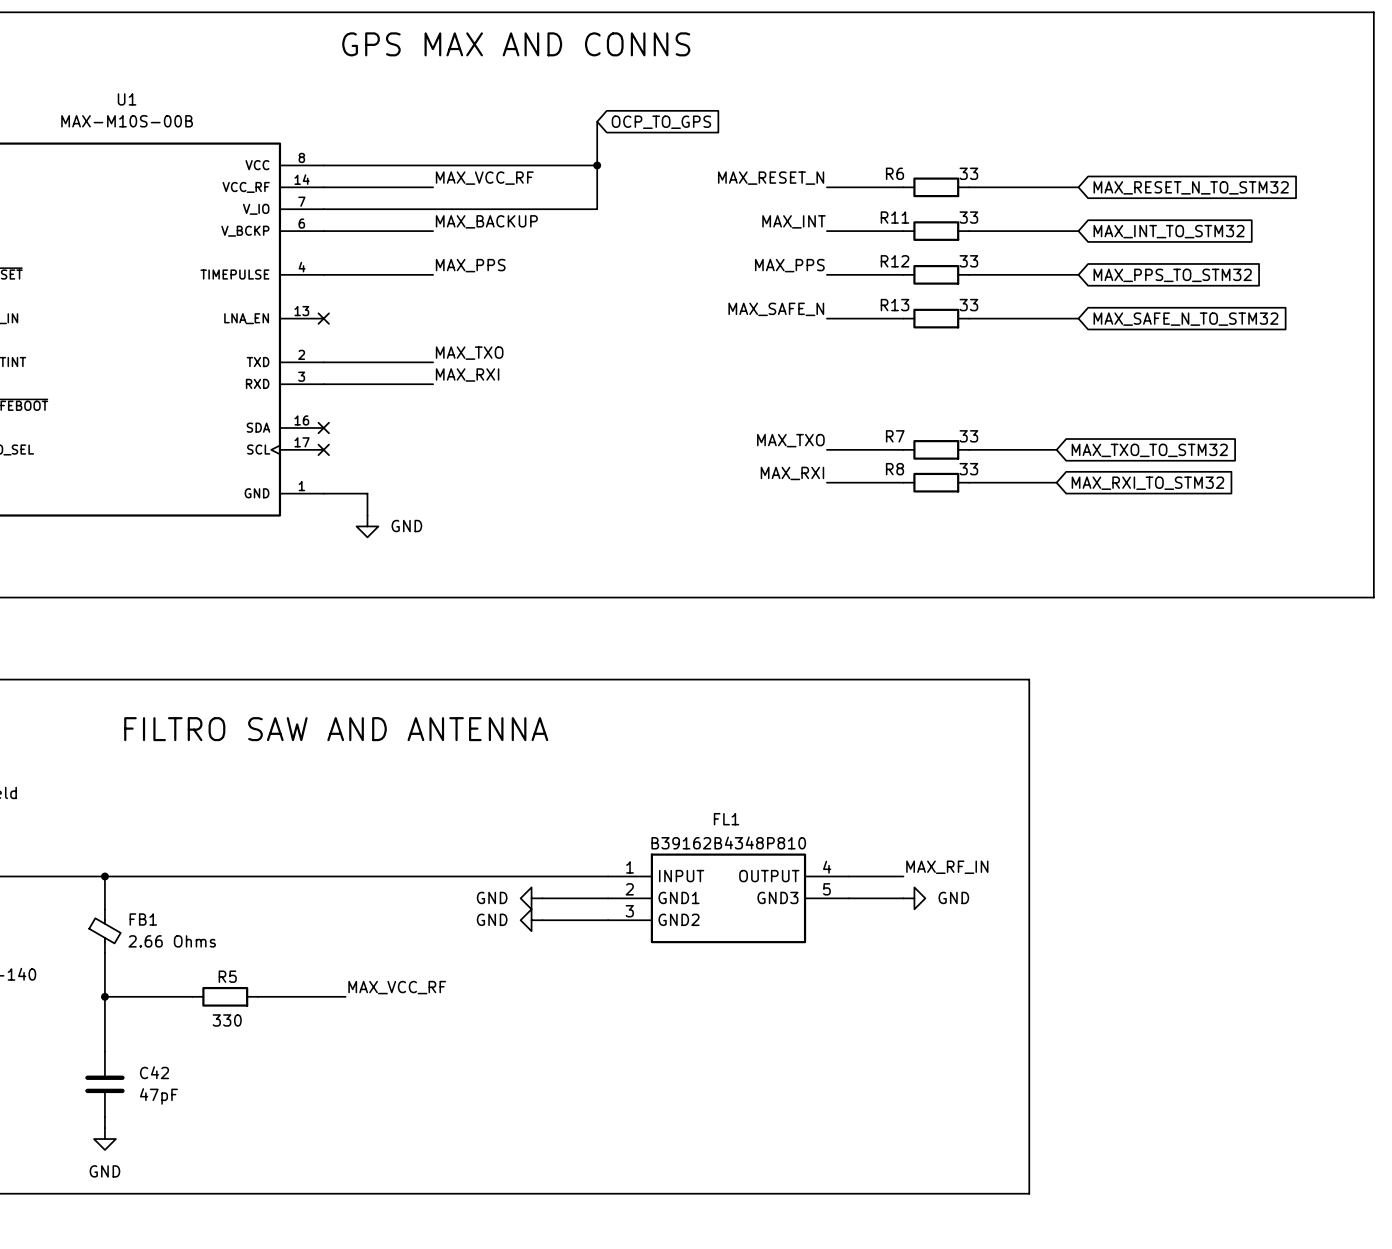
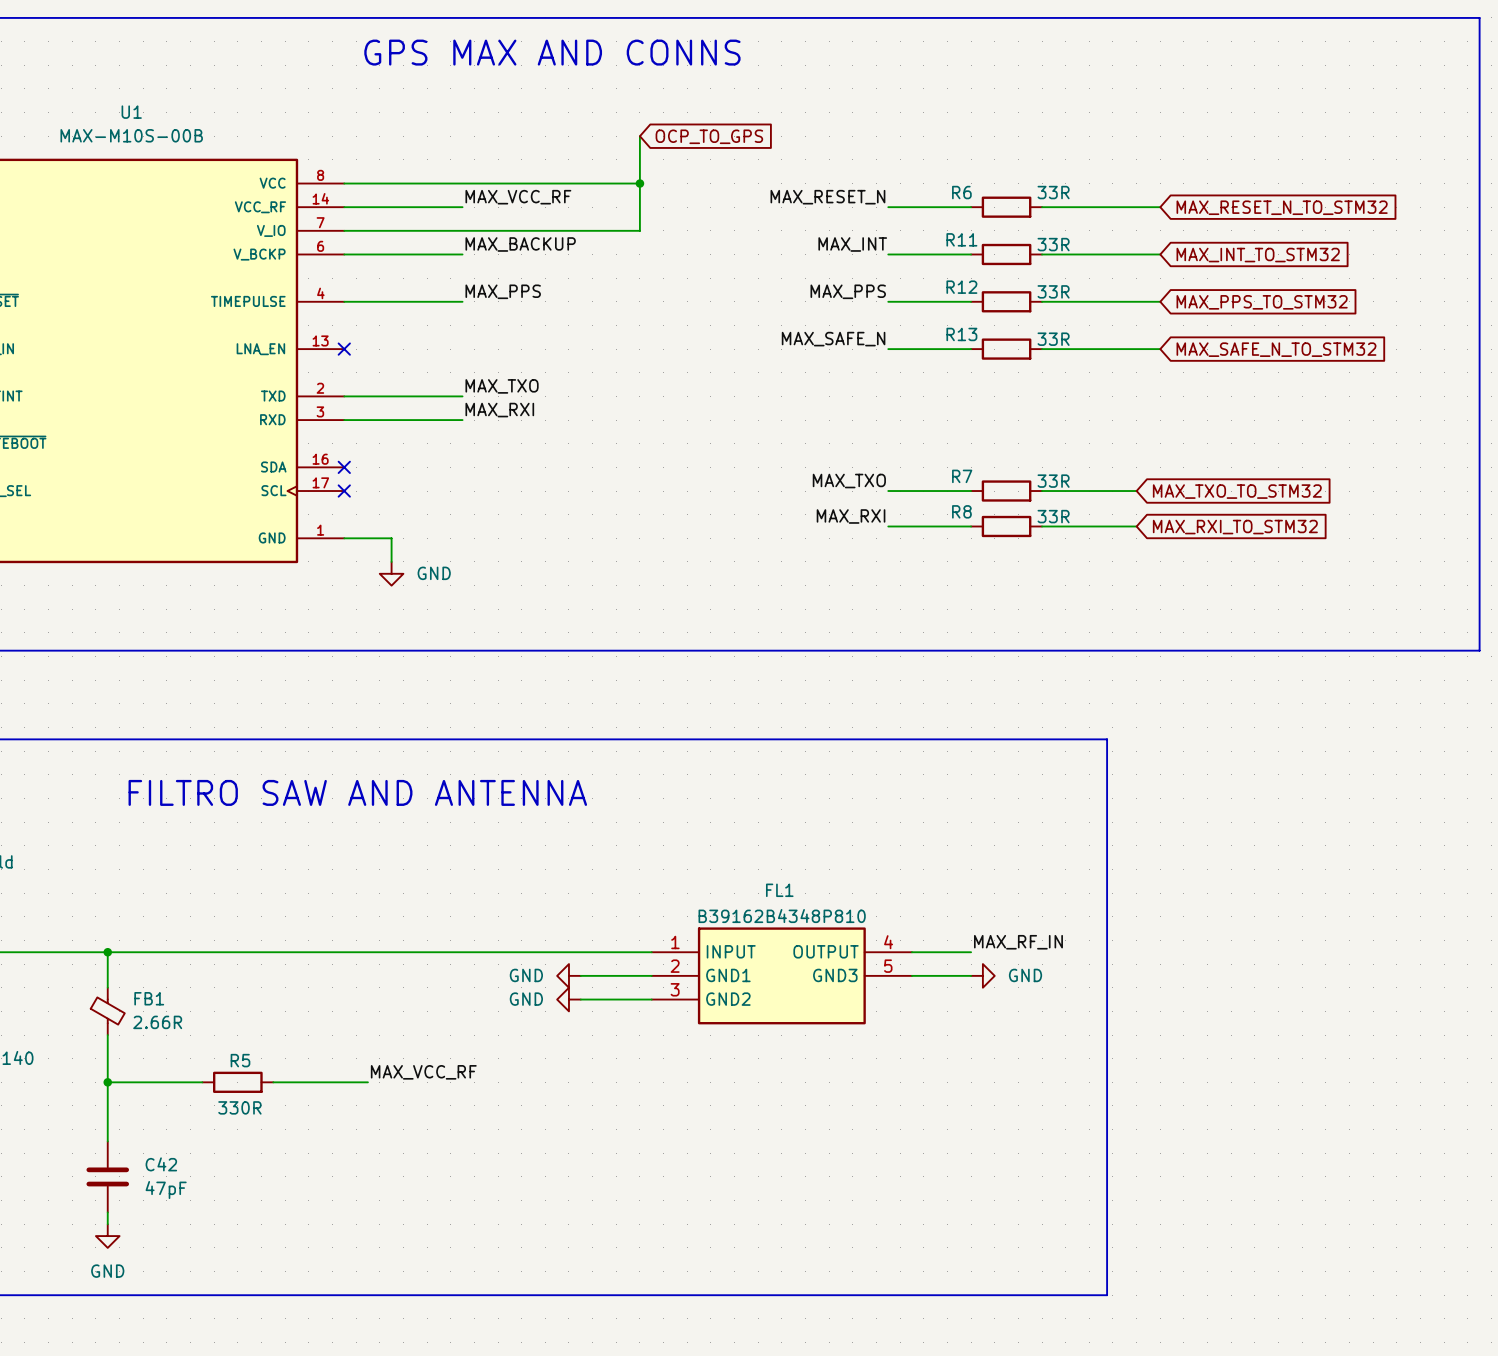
R6 value: 33 (968, 173) -> 33R (1053, 192)
R11 value: 33 (968, 217) -> 33R (1053, 244)
R12 value: 33 (968, 261) -> 33R (1053, 291)
R13 value: 33 (968, 305) -> 33R (1053, 339)
R7 value: 33 (968, 436) -> 33R (1053, 481)
R8 value: 33 (968, 469) -> 33R (1053, 516)
FB1 value: 2.66 Ohms (172, 941) -> 2.66R (157, 1022)
R5 value: 330 (227, 1020) -> 330R (239, 1107)

